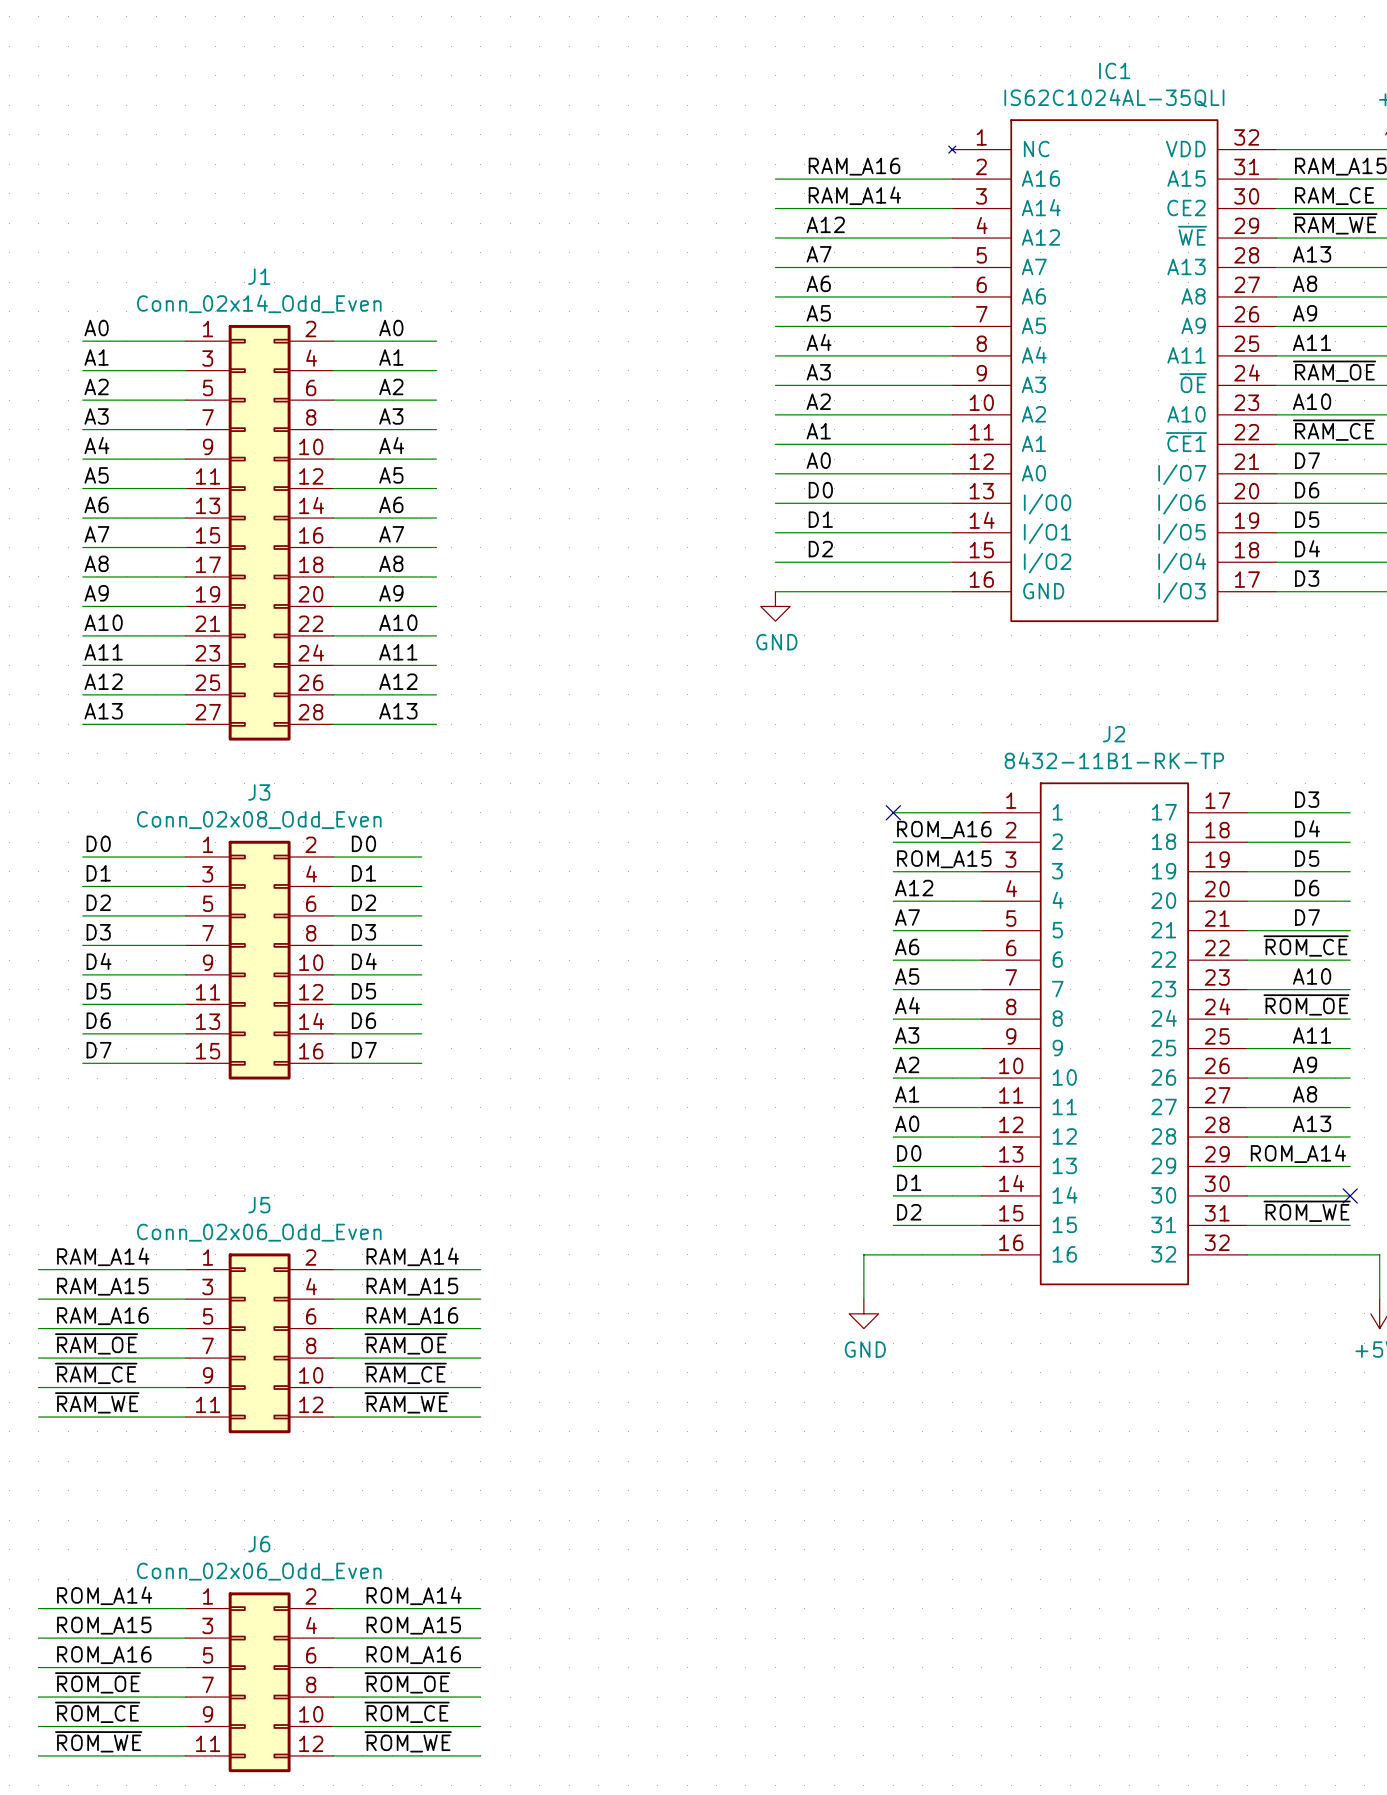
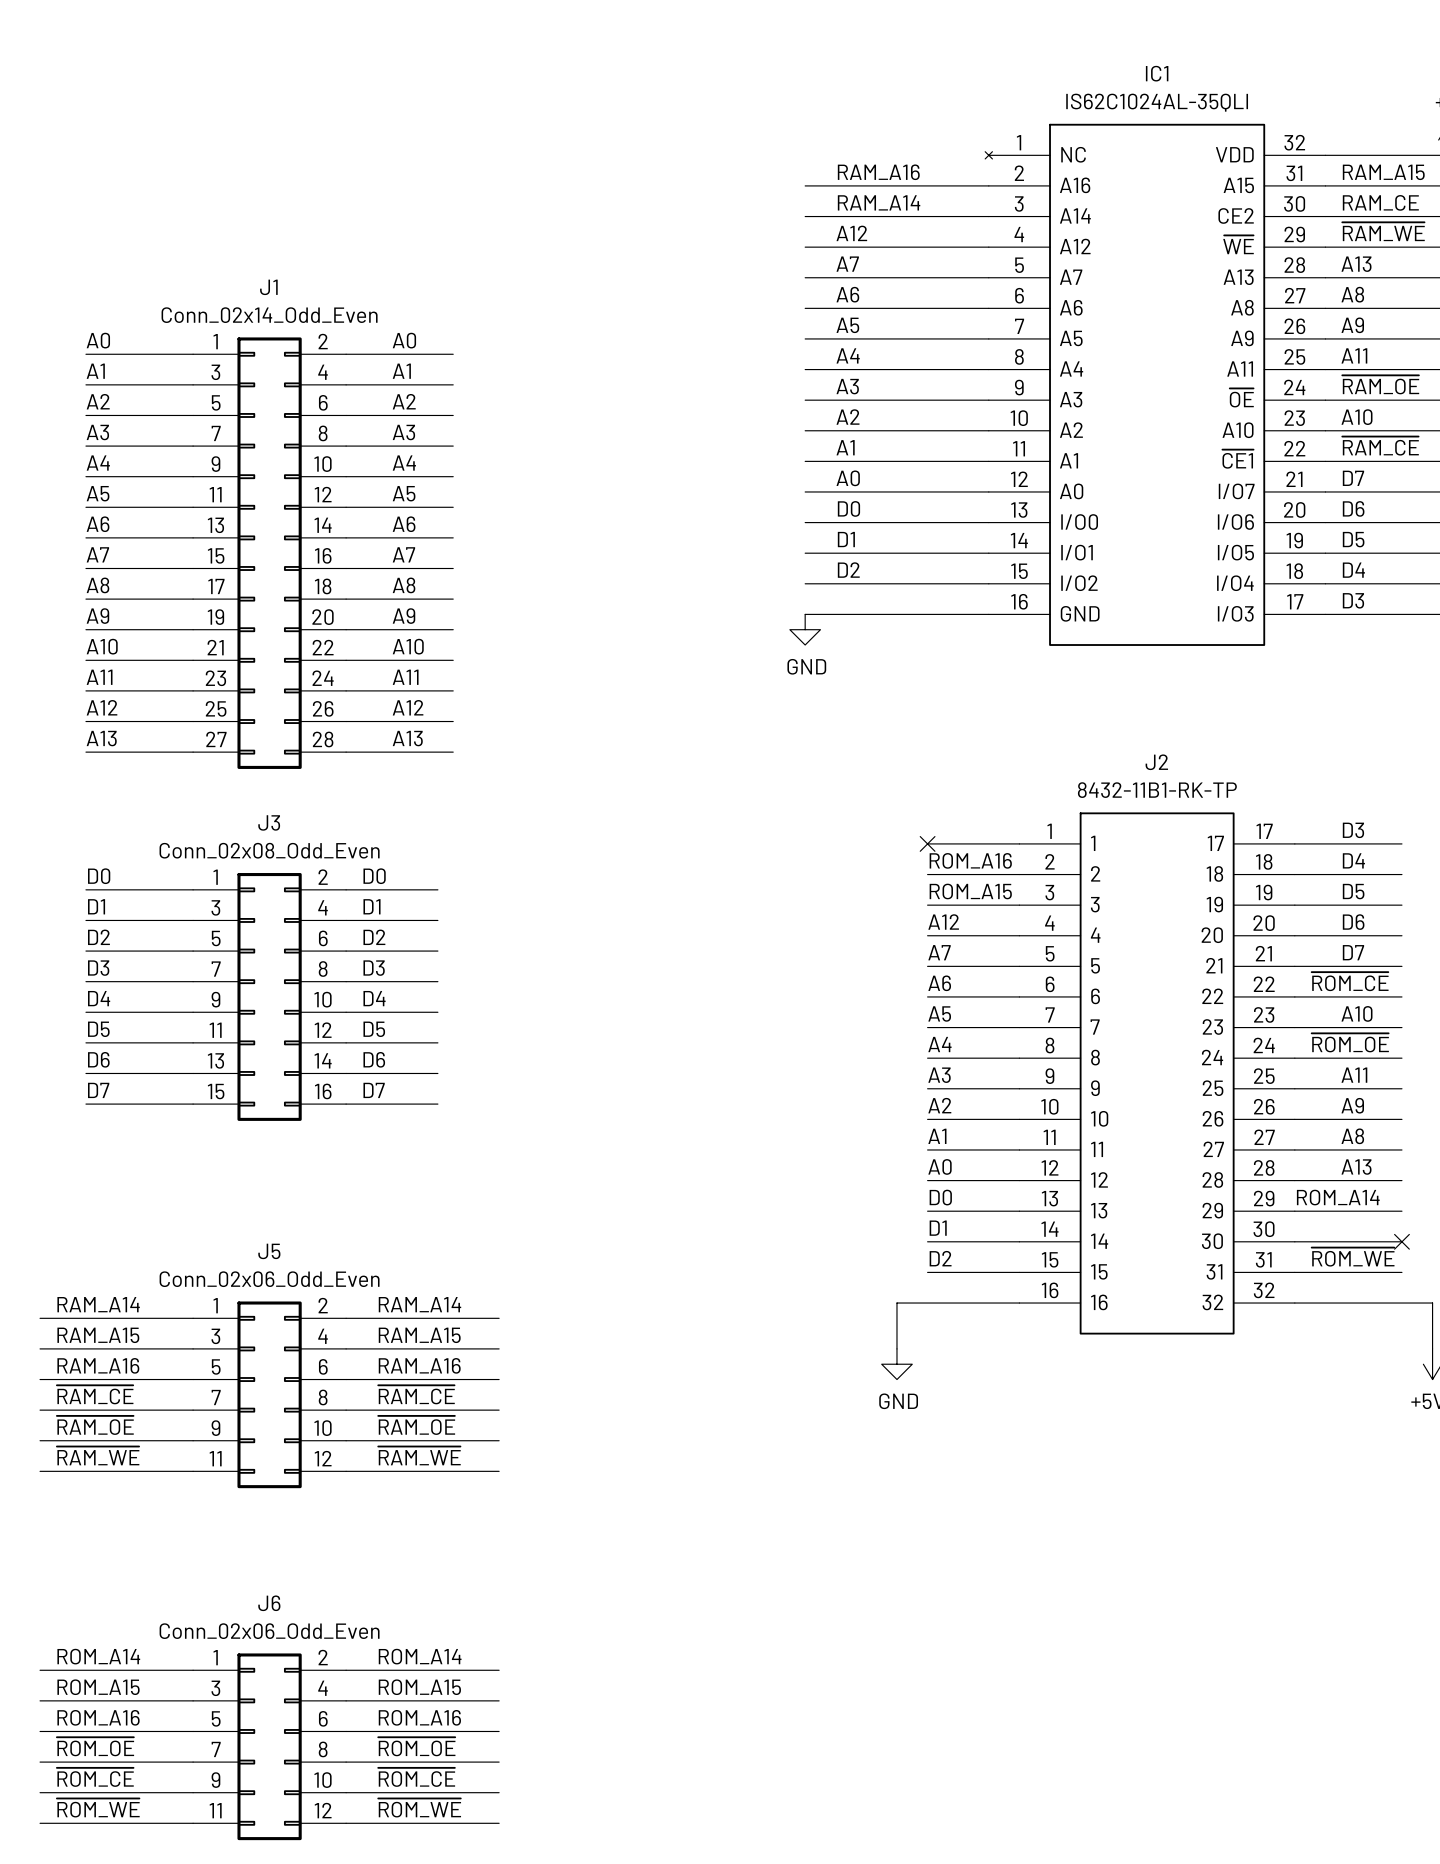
label: ~{RAM_OE} (96, 1343) -> ~{RAM_CE} (95, 1394)
label: ~{RAM_OE} (406, 1343) -> ~{RAM_CE} (416, 1394)
label: ~{RAM_CE} (96, 1373) -> ~{RAM_OE} (95, 1425)
label: ~{RAM_CE} (405, 1373) -> ~{RAM_OE} (416, 1425)

